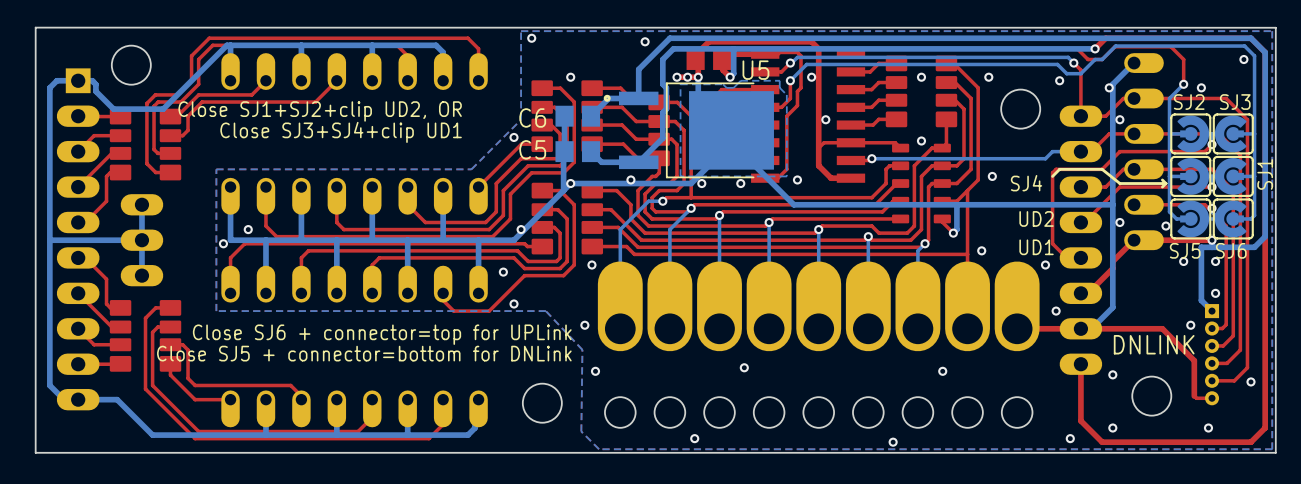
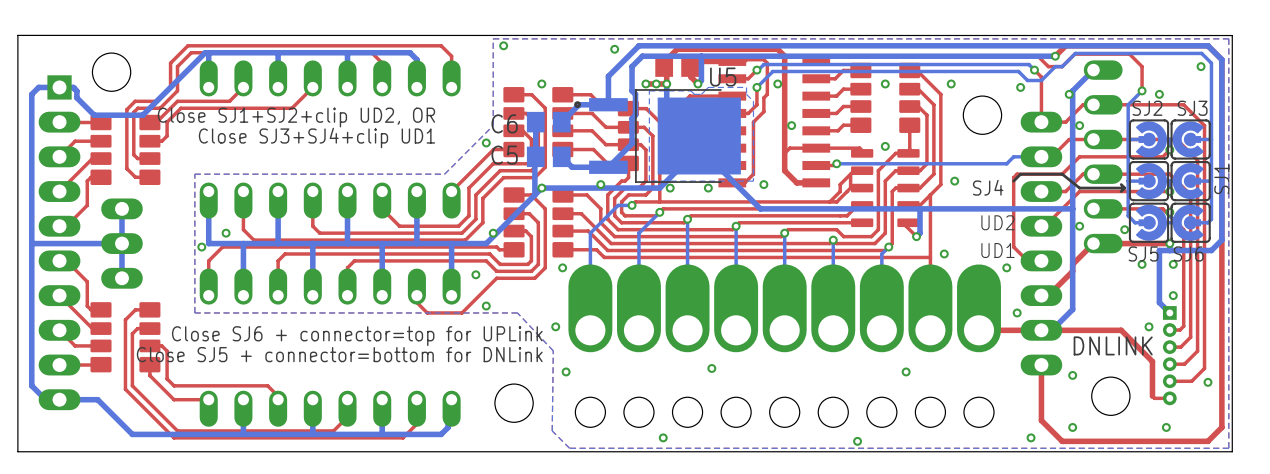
part footprint: [892, 143, 951, 224] -> [851, 149, 920, 228]
top track: none -> (850, 174) (840, 184) (840, 191) (829, 201)
top track: (896, 183) (875, 204) (868, 204) -> none

